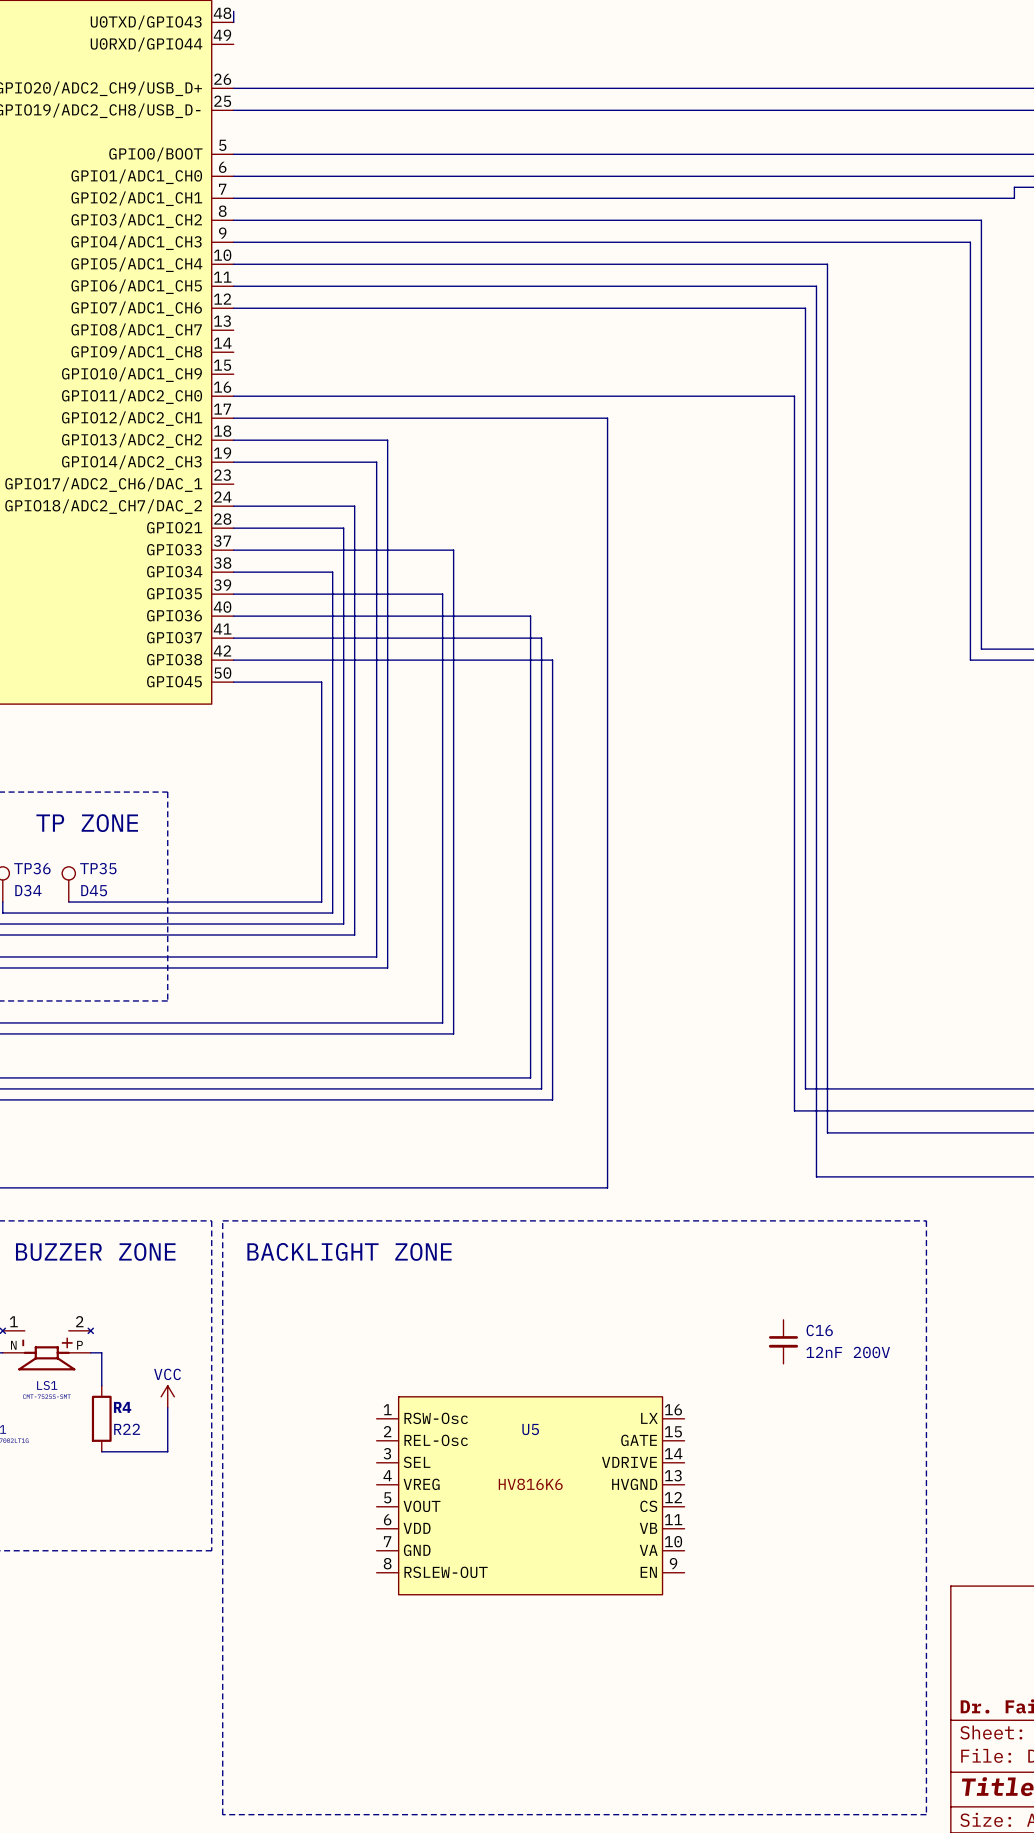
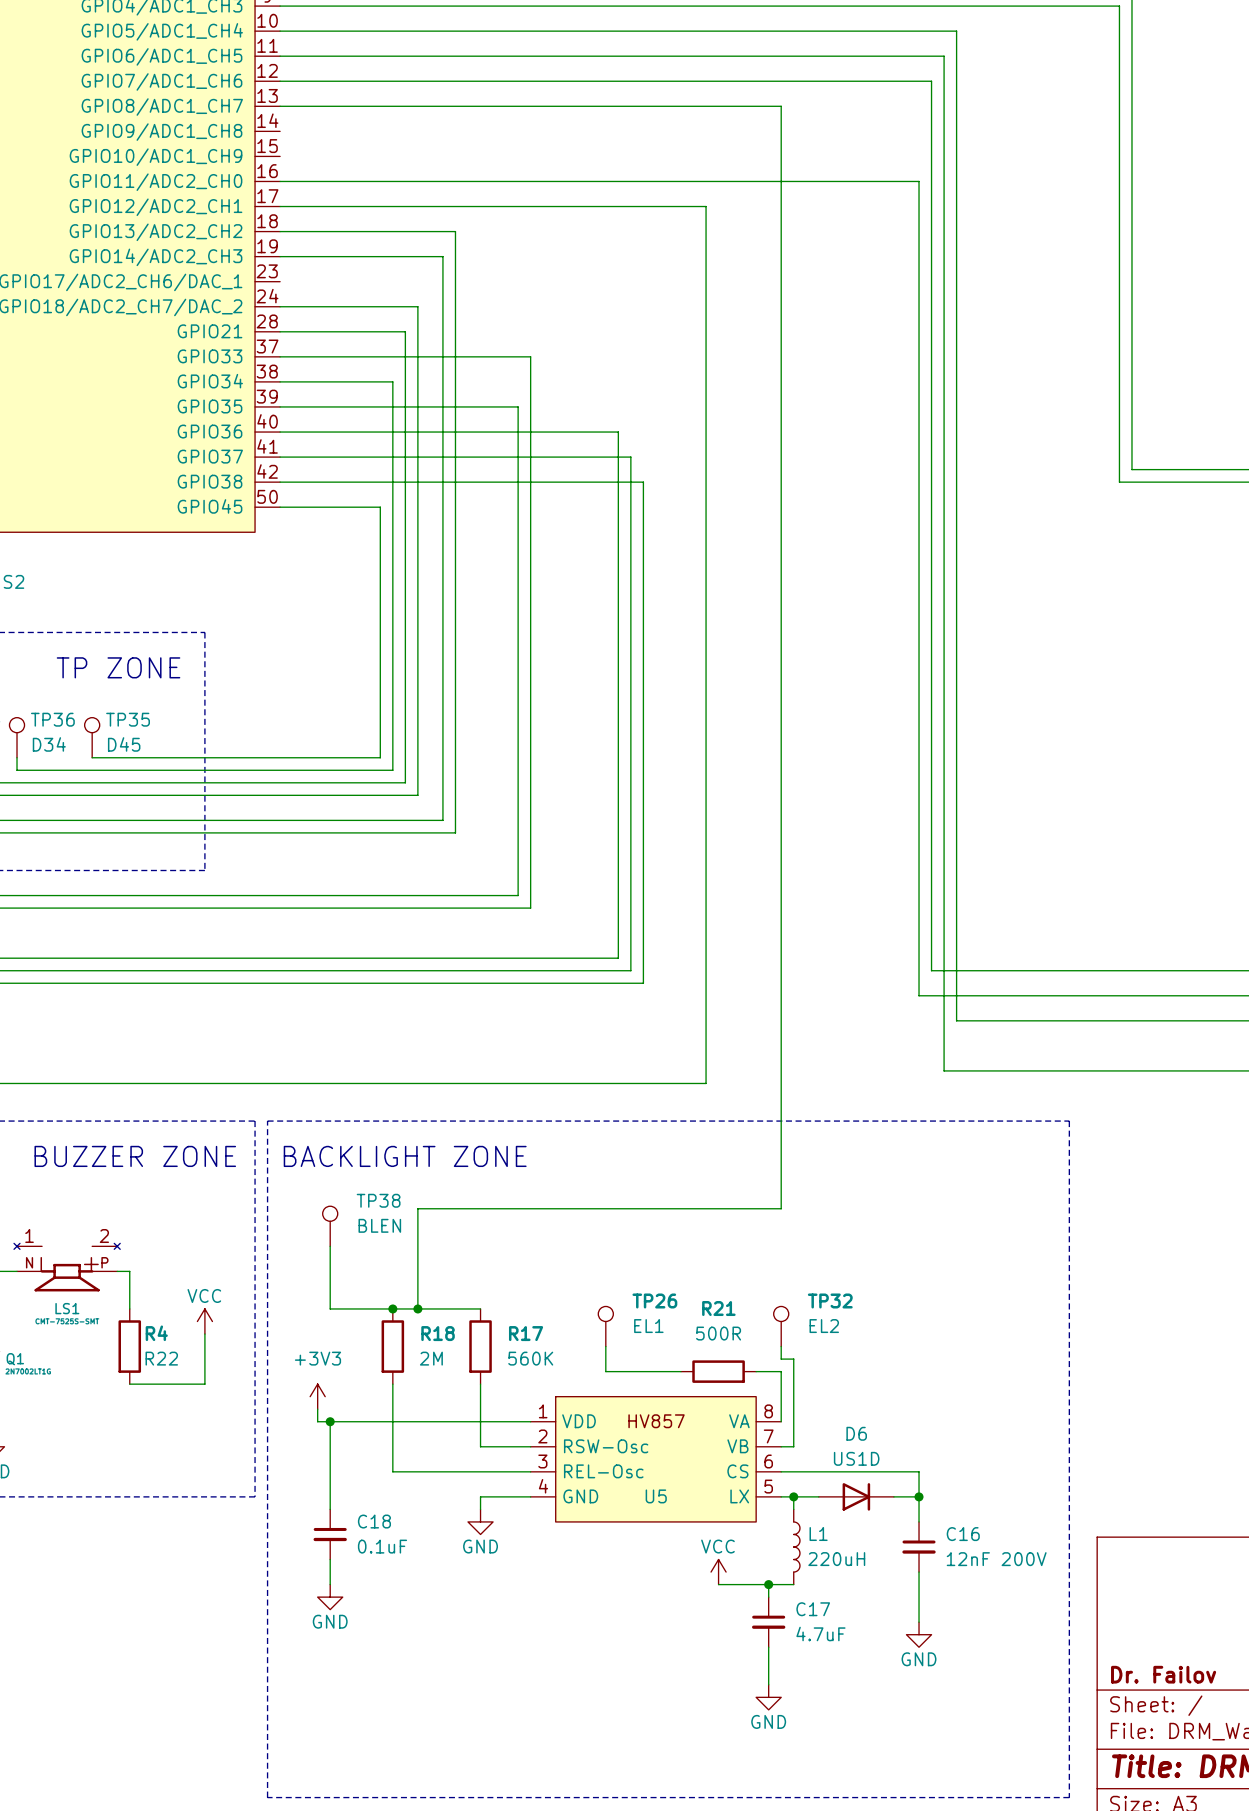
wire: none -> (280, 106) (781, 106) (781, 1208) (417, 1208) (417, 1308)
TP38: none -> BLEN (330, 1226)
wire: none -> (330, 1246) (330, 1308) (480, 1308)
C16 position: (783, 1341) -> (919, 1547)
junction: none -> (392, 1308)
junction: none -> (417, 1308)
U5 symbol: [376, 1396, 685, 1595] -> [530, 1396, 782, 1522]
TP26: none -> EL1 (605, 1326)
TP32: none -> EL2 (781, 1326)
R18: none -> 2M (392, 1346)
R17: none -> 560K (480, 1346)
wire: none -> (781, 1346) (781, 1359) (793, 1359) (793, 1446) (781, 1446)
U5 name position: U5 (530, 1429) -> U5 (656, 1496)
R21: none -> 500R (718, 1371)
wire: none -> (756, 1371) (781, 1371) (781, 1421)
wire: none -> (392, 1384) (392, 1471) (530, 1471)
power symbol: none -> +3V3 (317, 1396)
wire: none -> (317, 1409) (317, 1421) (530, 1421)
wire: none -> (330, 1421) (330, 1509)
junction: none -> (330, 1421)
wire: none -> (781, 1471) (919, 1471) (919, 1521)
wire: none -> (781, 1496) (818, 1496)
wire: none -> (793, 1496) (793, 1509)
junction: none -> (793, 1496)
D6: none -> US1D (856, 1496)
wire: none -> (893, 1496) (919, 1496)
junction: none -> (919, 1496)
power symbol: none -> GND (480, 1521)
C18: none -> 0.1uF (330, 1534)
L1: none -> 220uH (796, 1547)
wire: none -> (330, 1559) (330, 1584)
power symbol: none -> VCC (718, 1572)
wire: none -> (919, 1572) (919, 1622)
wire: none -> (718, 1584) (793, 1584)
wire: none -> (768, 1584) (768, 1597)
junction: none -> (768, 1584)
power symbol: none -> GND (330, 1597)
C17: none -> 4.7uF (768, 1622)
power symbol: none -> GND (919, 1634)
wire: none -> (768, 1647) (768, 1684)
power symbol: none -> GND (768, 1697)

